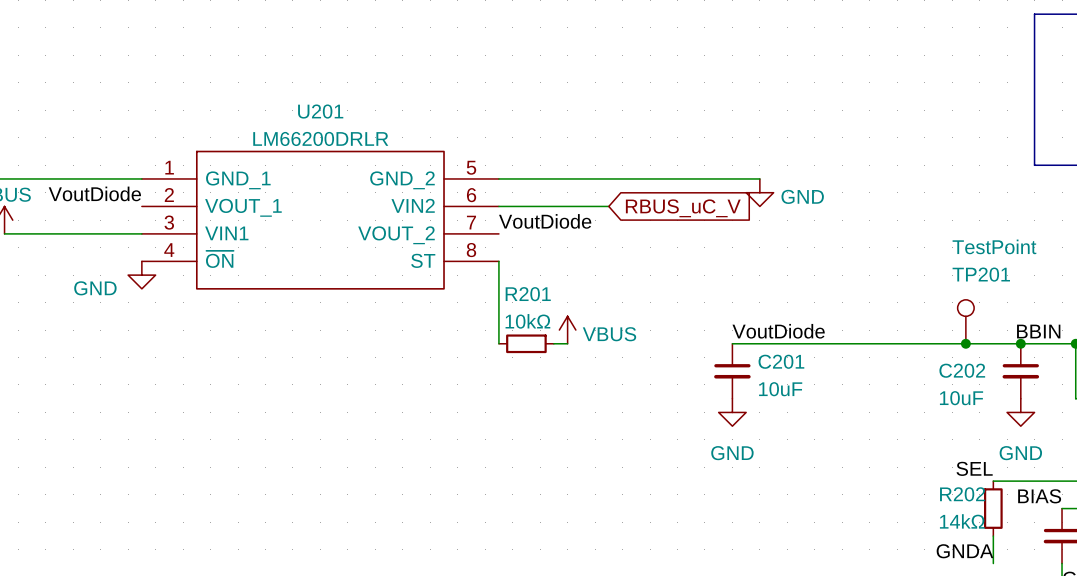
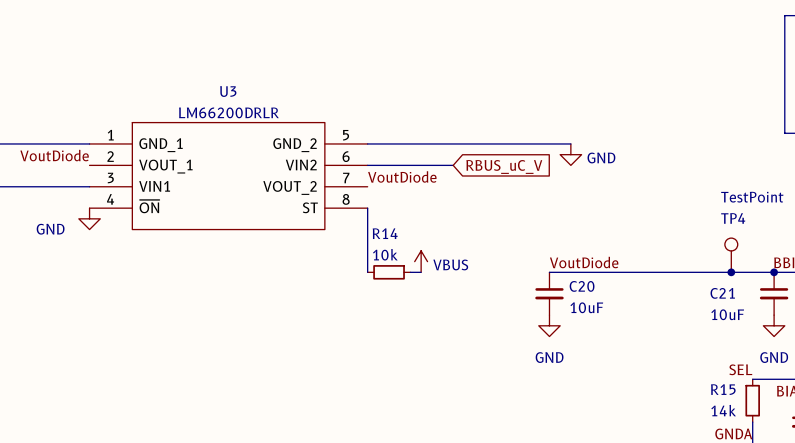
U201 name: U201 (320, 111) -> U3 (228, 91)
TP201 name: TP201 (981, 274) -> TP4 (733, 218)
R201 name: R201 (528, 294) -> R14 (385, 233)
R201 value: 10kΩ (527, 321) -> 10k (385, 254)
C201 name: C201 (781, 361) -> C20 (582, 286)
C202 name: C202 (962, 370) -> C21 (722, 293)
R202 name: R202 (962, 494) -> R15 (723, 389)
R202 value: 14kΩ (962, 521) -> 14k (723, 410)

